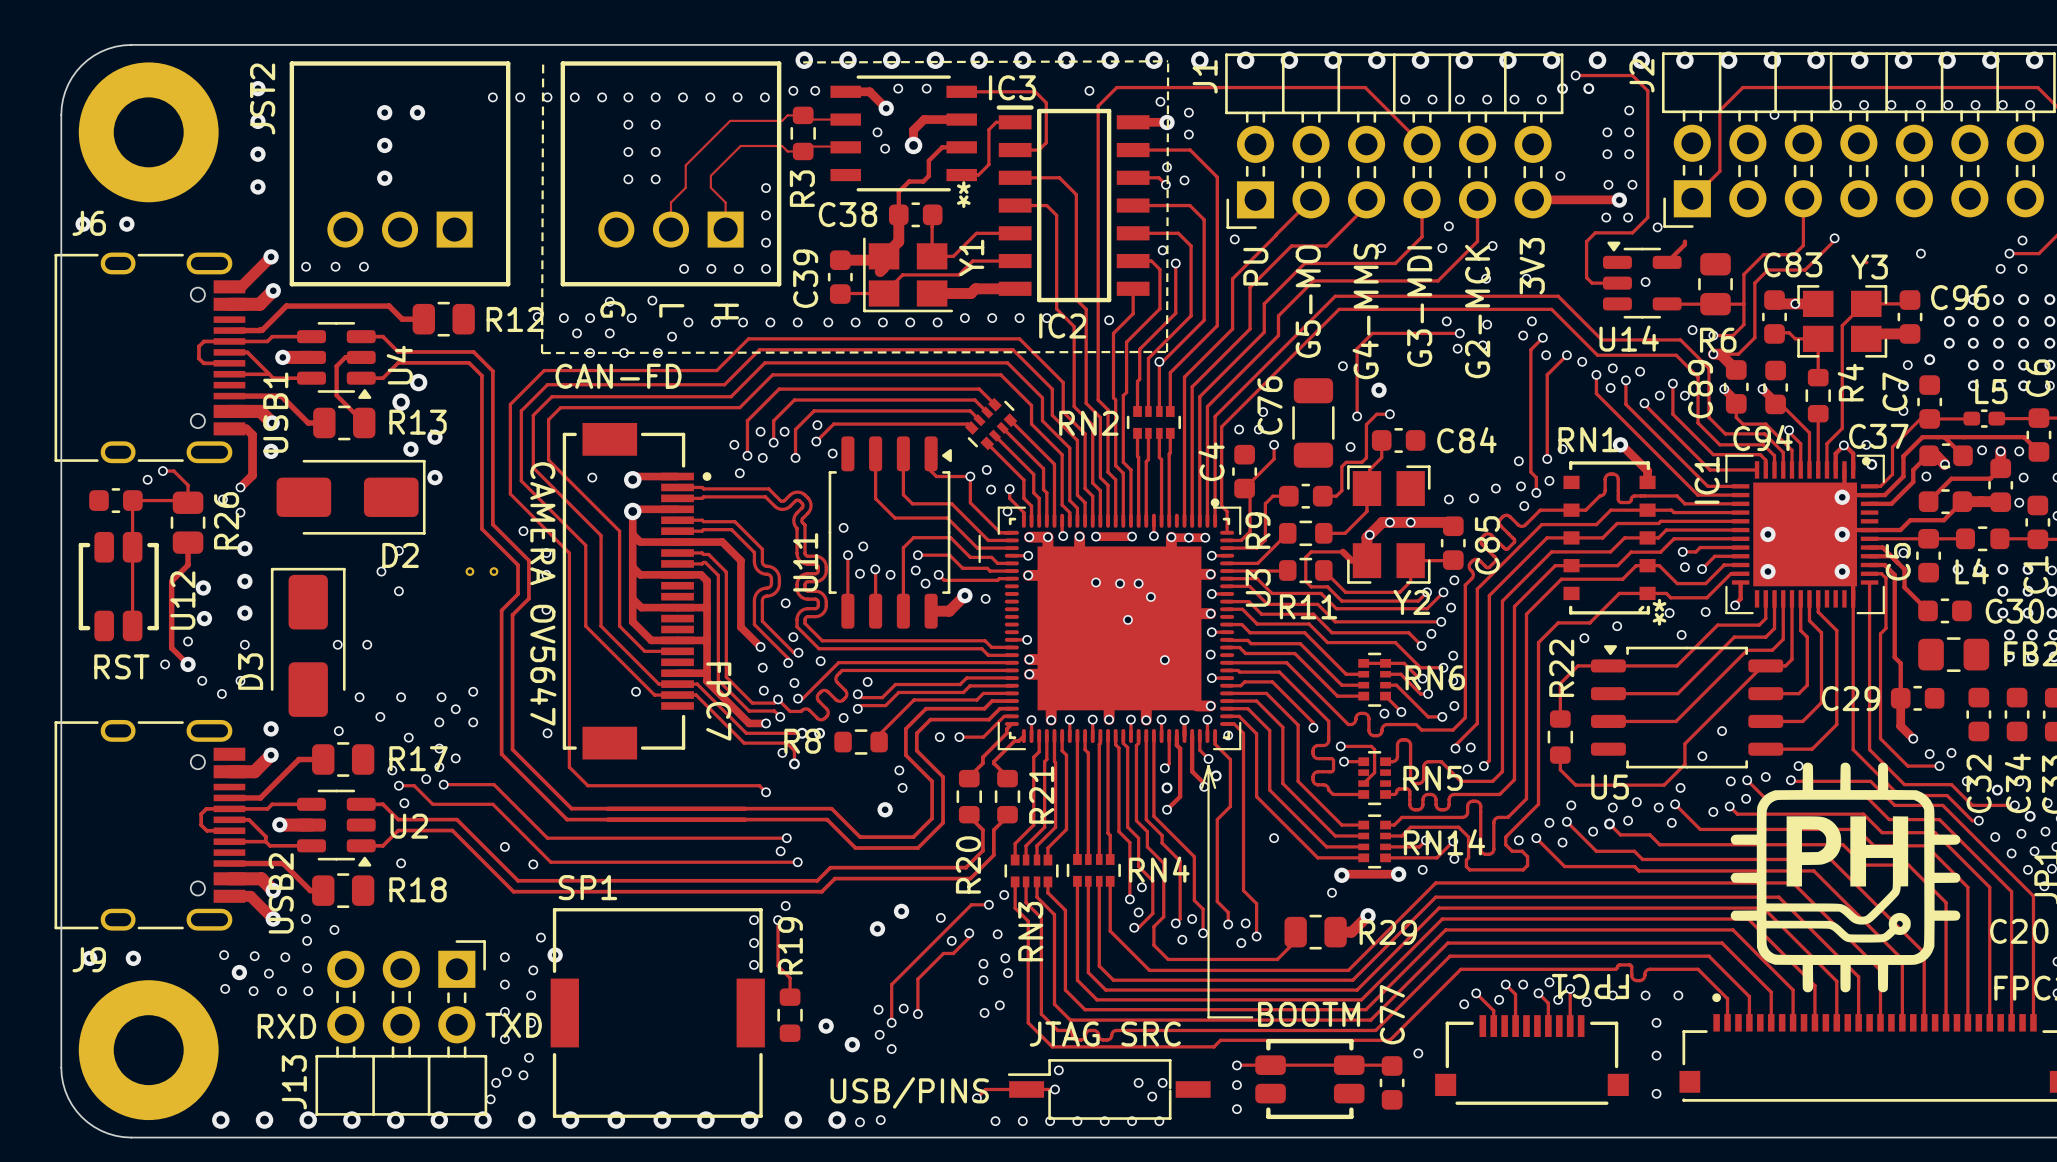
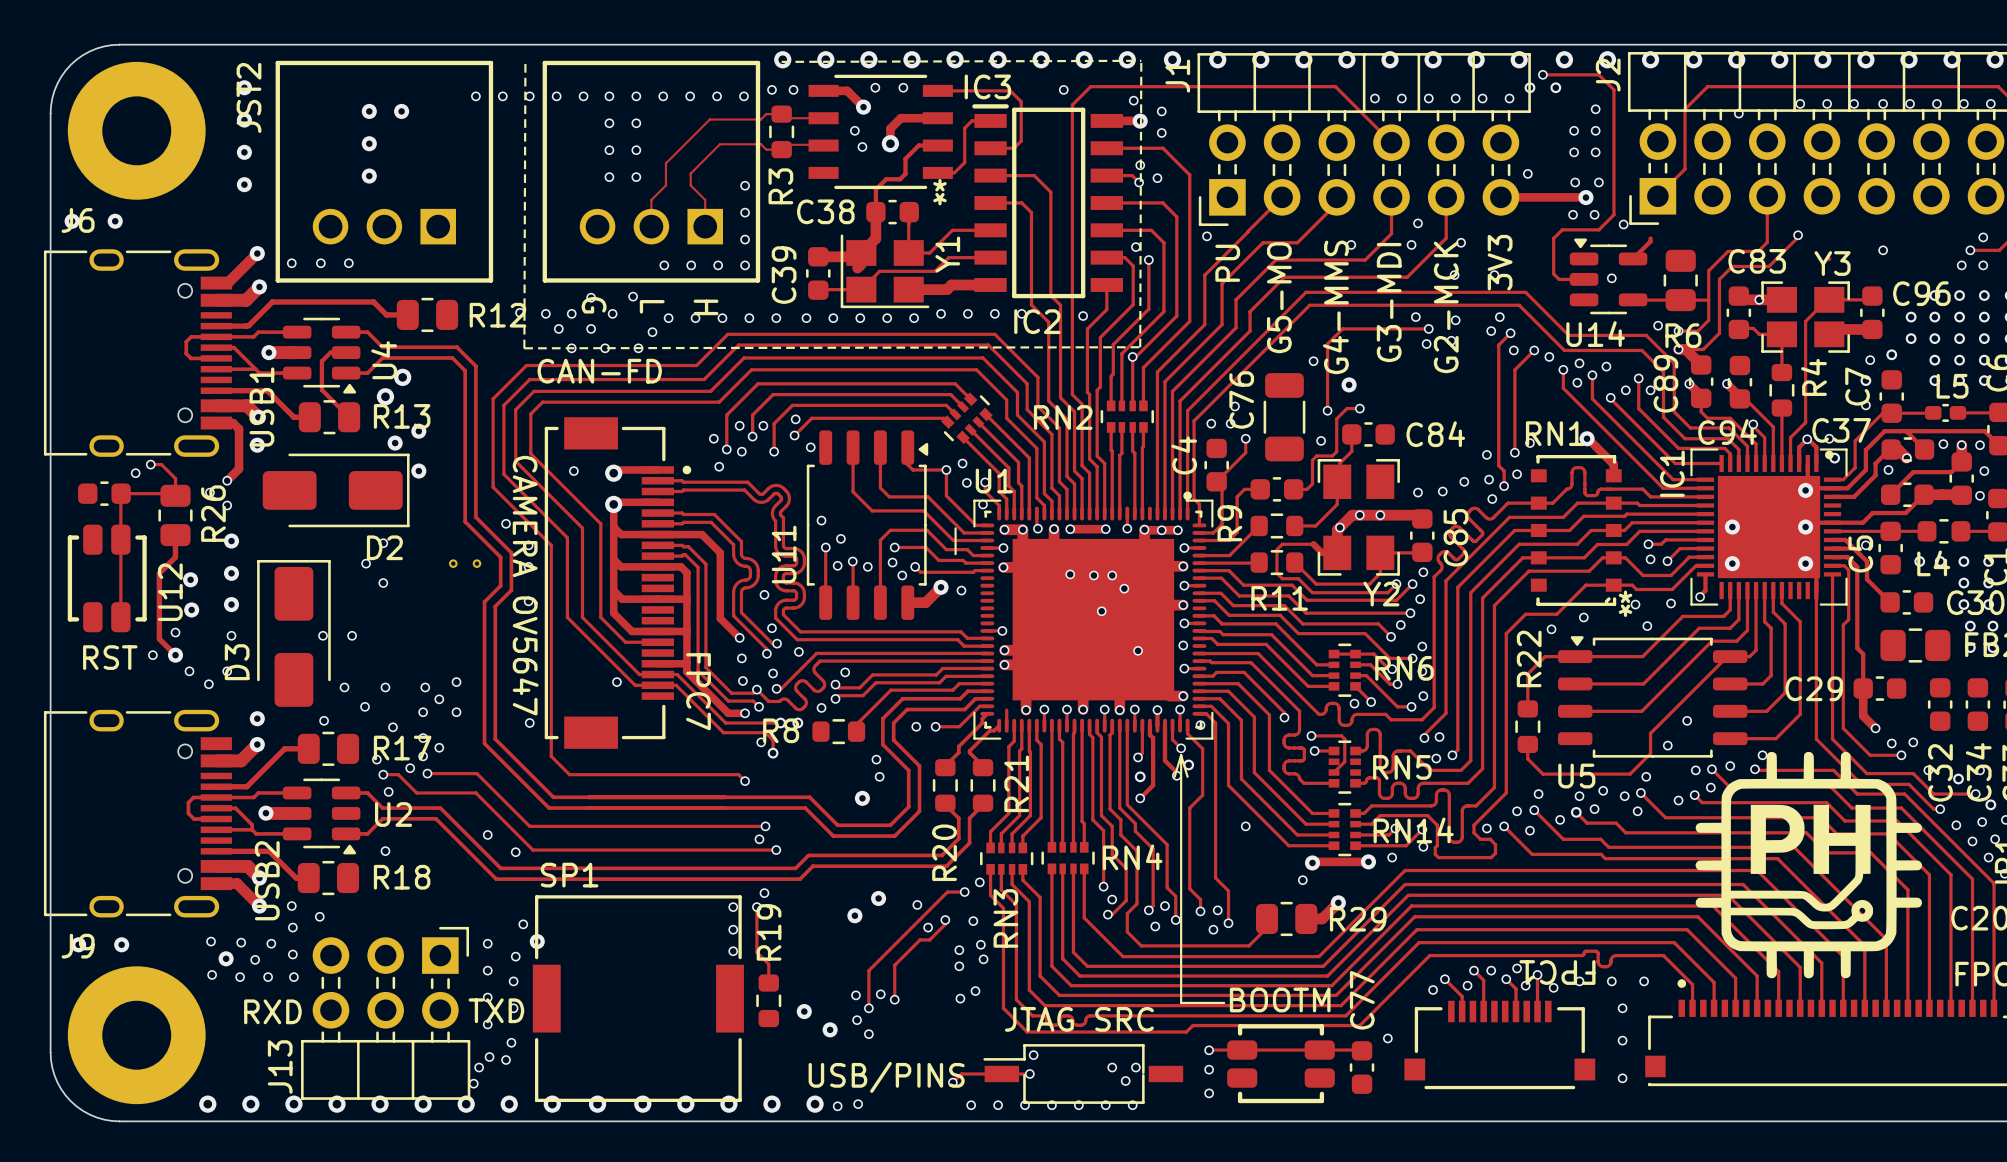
U3 name: U3 (1258, 587) -> U1 (994, 481)
via: (1031, 720) -> none
via: (1141, 887) -> none

